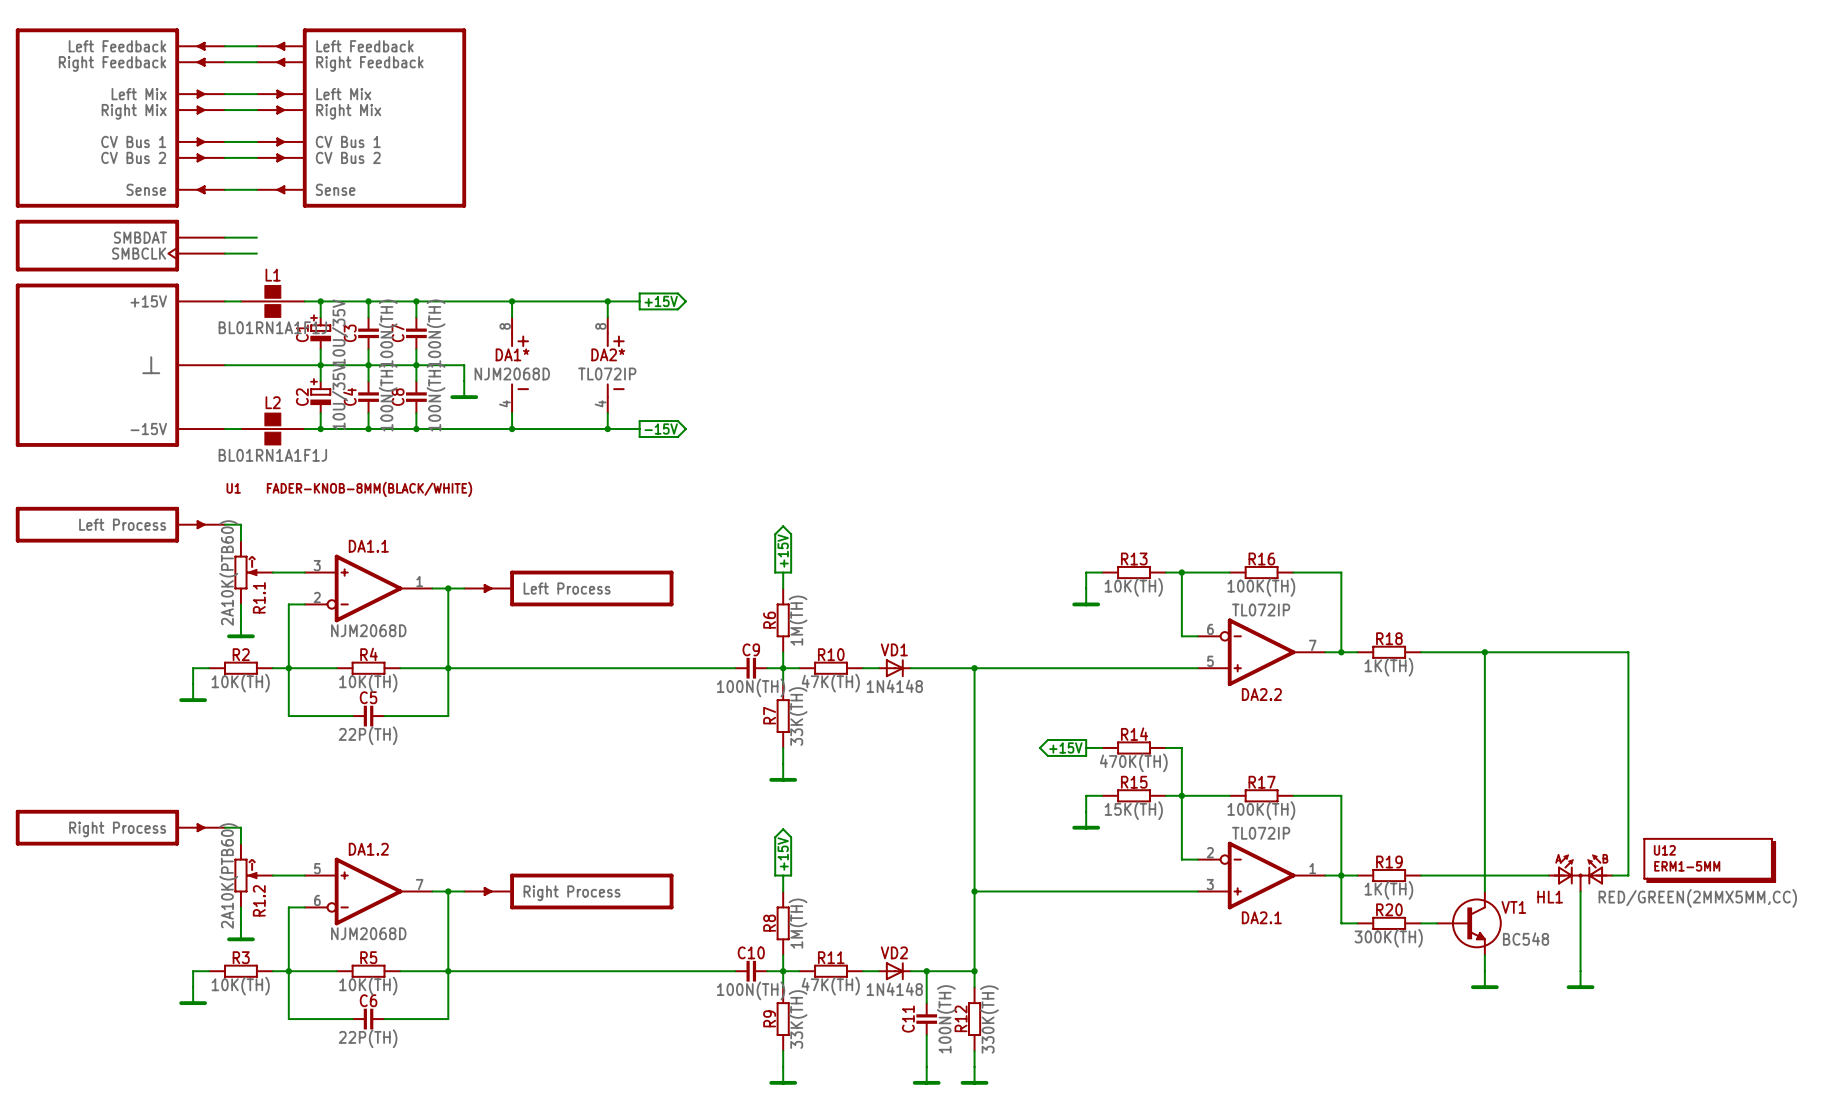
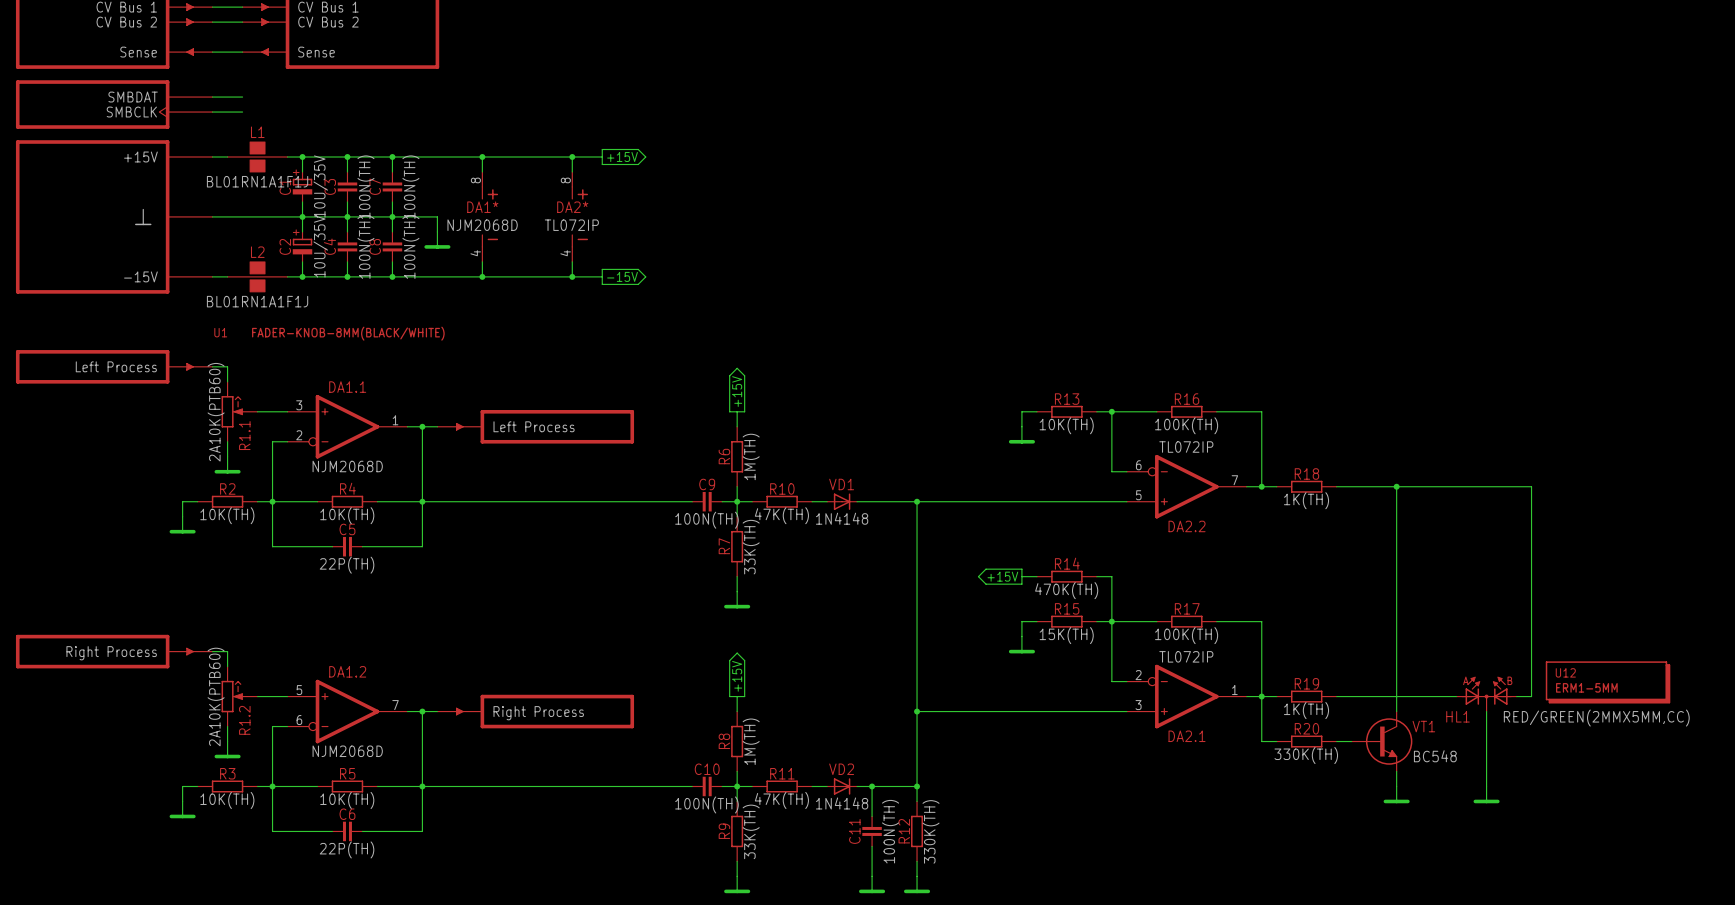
R20 value: 300K(TH) (1388, 938) -> 330K(TH) (1306, 755)

